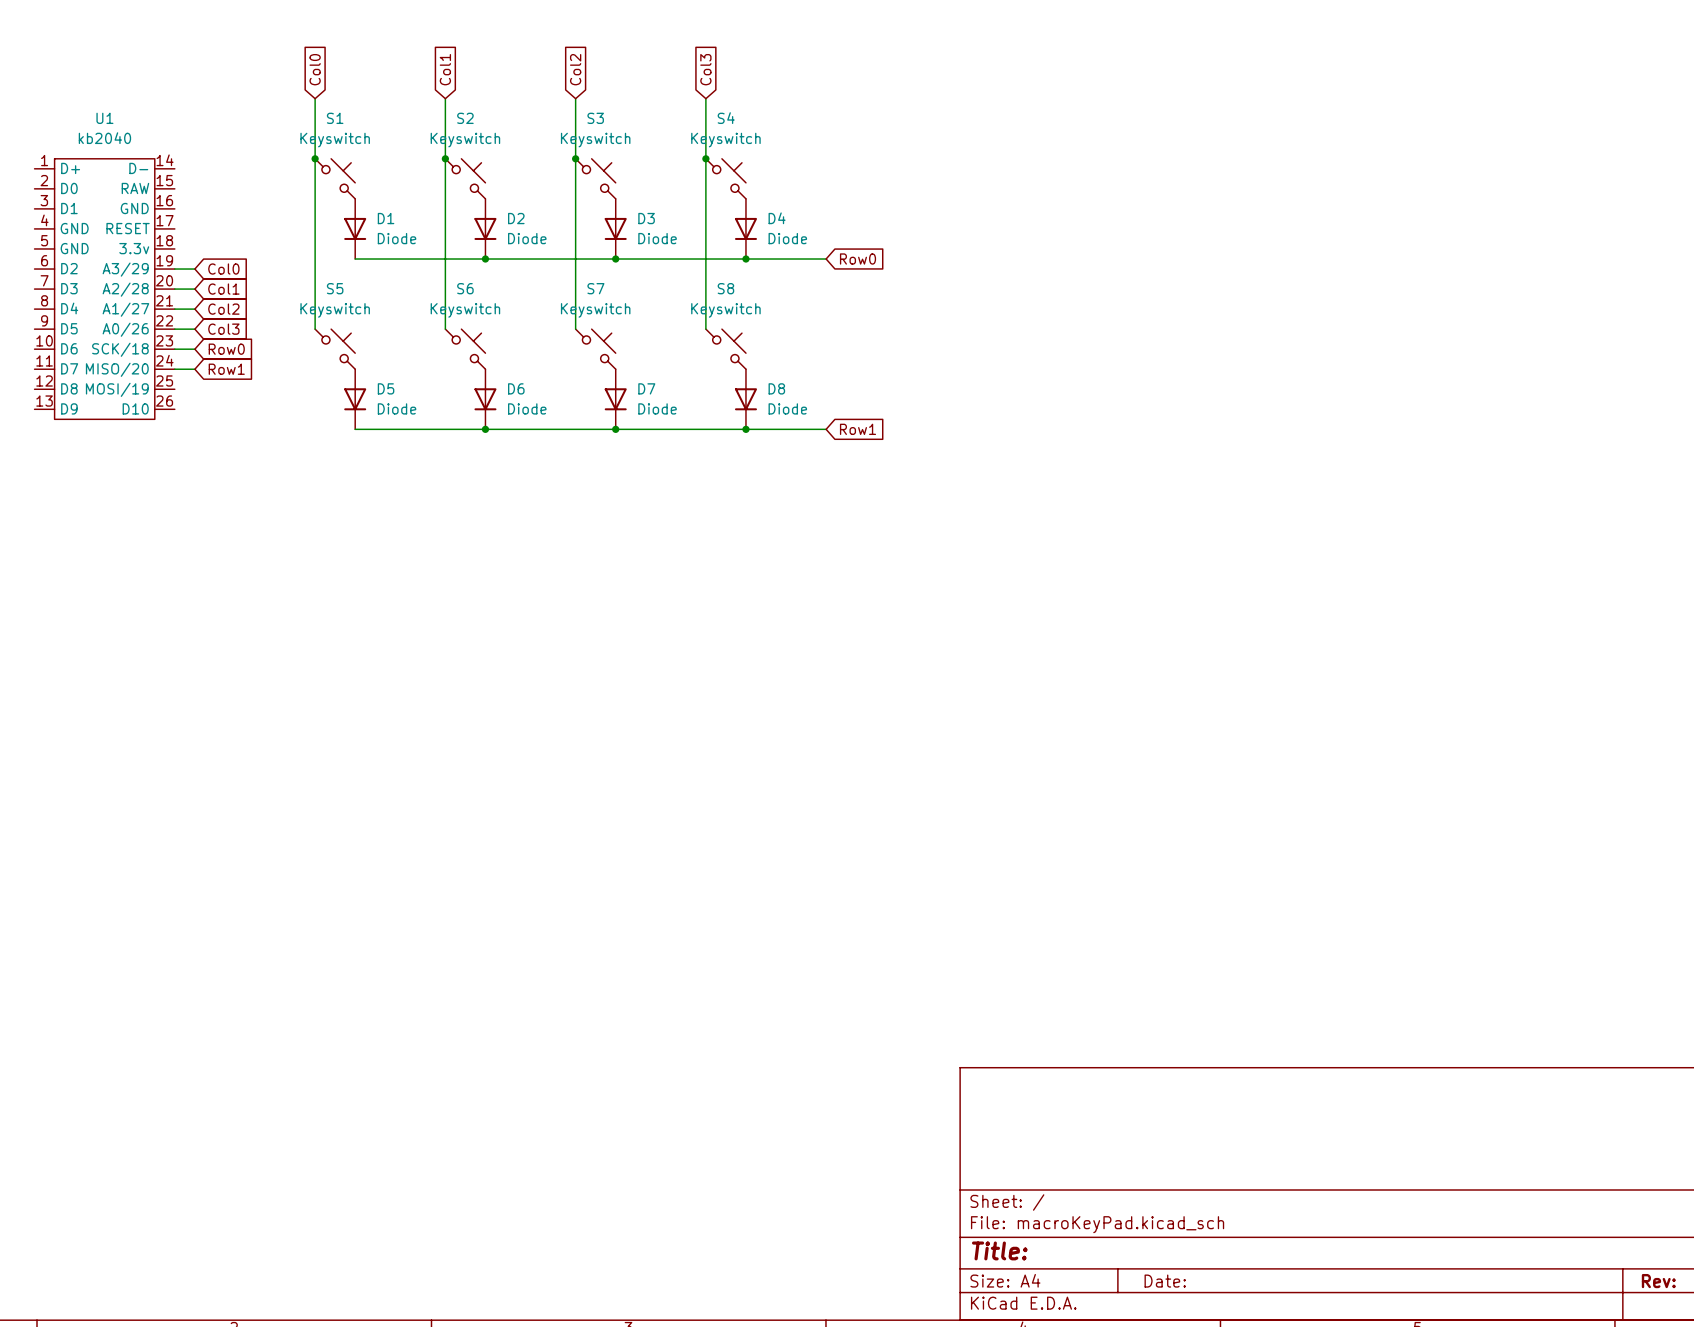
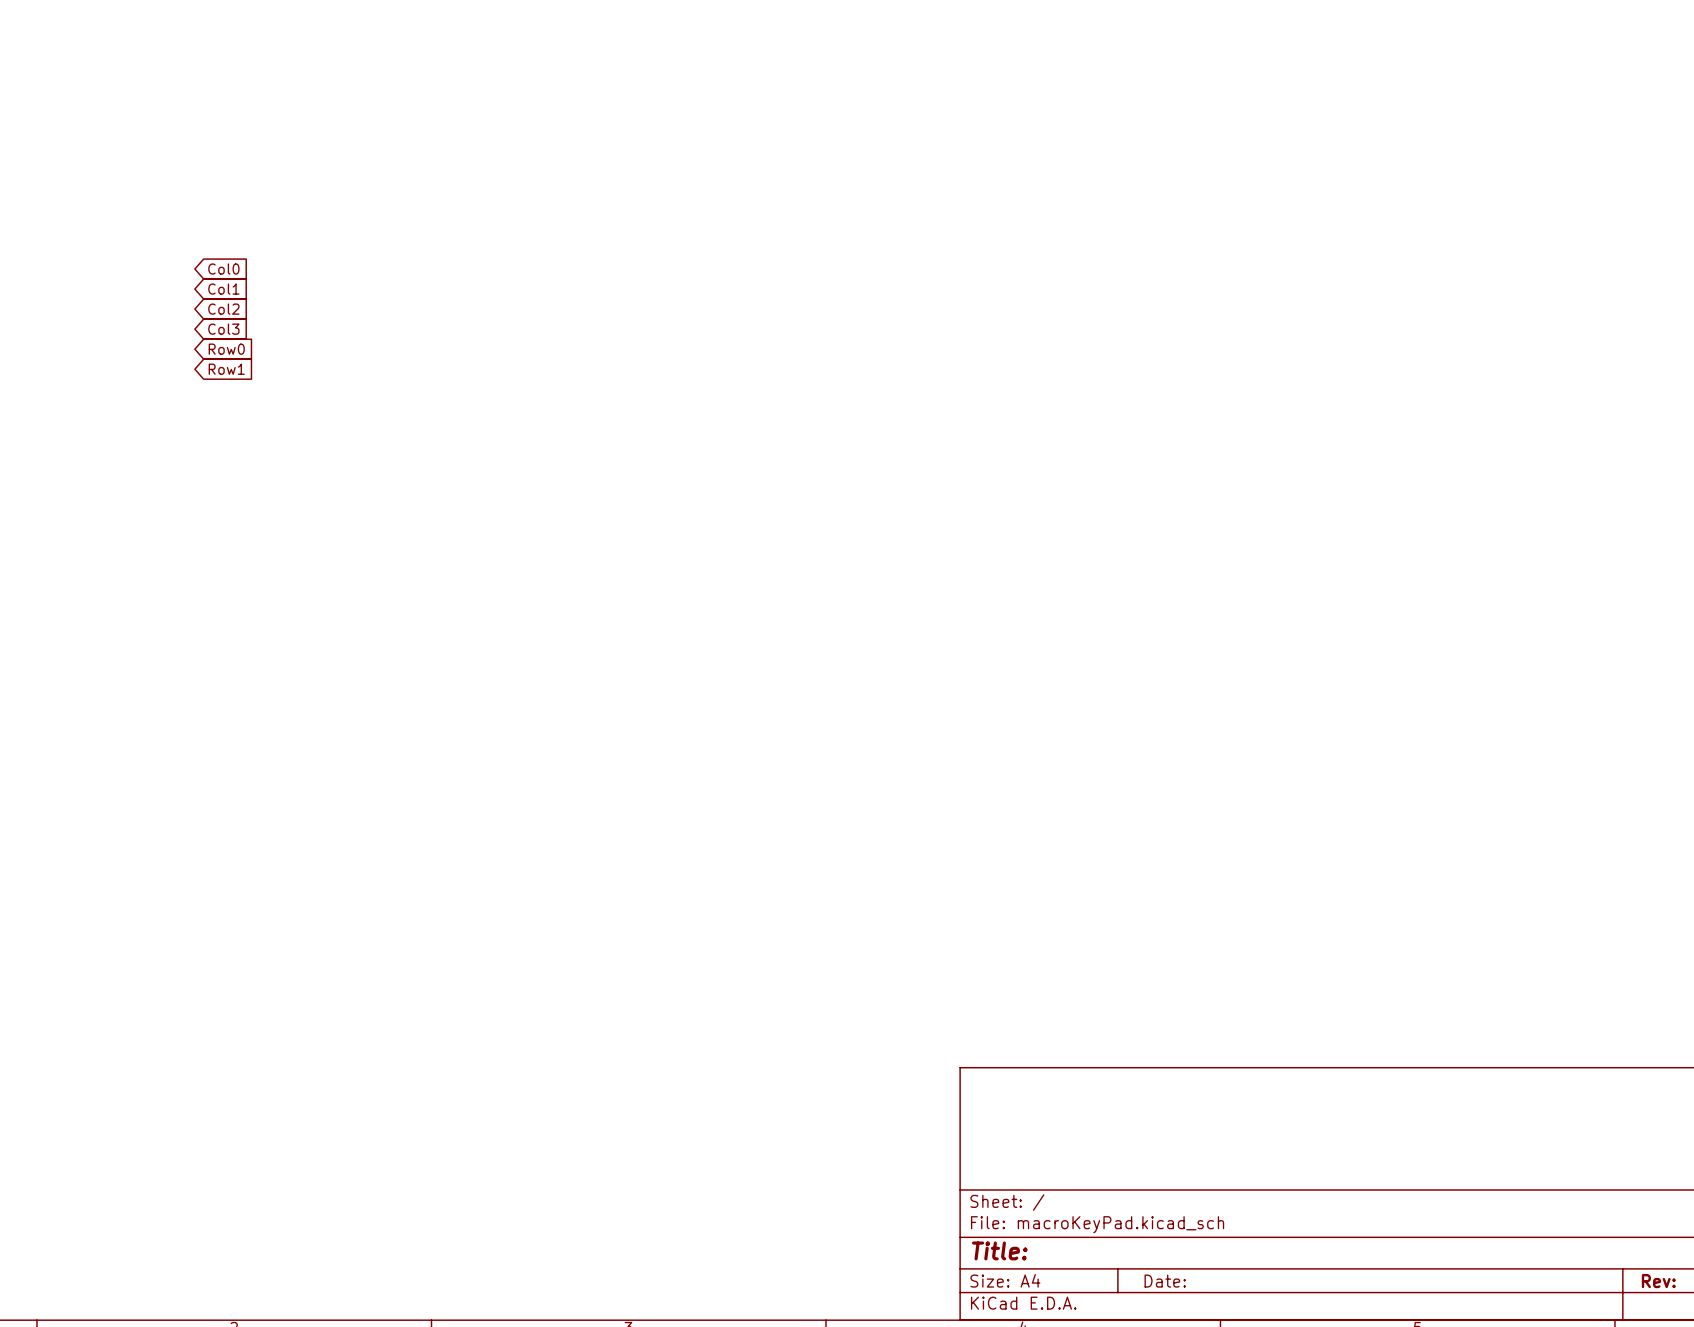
global label: Col0 (315, 69) -> none
global label: Col1 (445, 69) -> none
global label: Col2 (575, 69) -> none
global label: Col3 (705, 69) -> none
wire: (315, 98) (315, 329) -> none
wire: (445, 98) (445, 329) -> none
wire: (575, 98) (575, 329) -> none
wire: (705, 98) (705, 329) -> none
junction: (315, 158) -> none
junction: (445, 158) -> none
junction: (575, 158) -> none
junction: (705, 158) -> none
S1: Keyswitch (335, 178) -> none
S2: Keyswitch (465, 178) -> none
S3: Keyswitch (595, 178) -> none
S4: Keyswitch (725, 178) -> none
D1: Diode (355, 228) -> none
D2: Diode (485, 228) -> none
D3: Diode (615, 228) -> none
D4: Diode (745, 228) -> none
wire: (355, 259) (826, 259) -> none
junction: (485, 259) -> none
junction: (615, 259) -> none
junction: (745, 259) -> none
global label: Row0 (858, 259) -> none
wire: (174, 269) (194, 269) -> none
U1: kb2040 (104, 289) -> none
wire: (174, 289) (194, 289) -> none
wire: (174, 309) (194, 309) -> none
wire: (174, 329) (194, 329) -> none
wire: (174, 349) (194, 349) -> none
S5: Keyswitch (335, 349) -> none
S6: Keyswitch (465, 349) -> none
S7: Keyswitch (595, 349) -> none
S8: Keyswitch (725, 349) -> none
wire: (174, 369) (194, 369) -> none
D5: Diode (355, 399) -> none
D6: Diode (485, 399) -> none
D7: Diode (615, 399) -> none
D8: Diode (745, 399) -> none
wire: (355, 429) (826, 429) -> none
junction: (485, 429) -> none
junction: (615, 429) -> none
junction: (745, 429) -> none
global label: Row1 (858, 429) -> none

